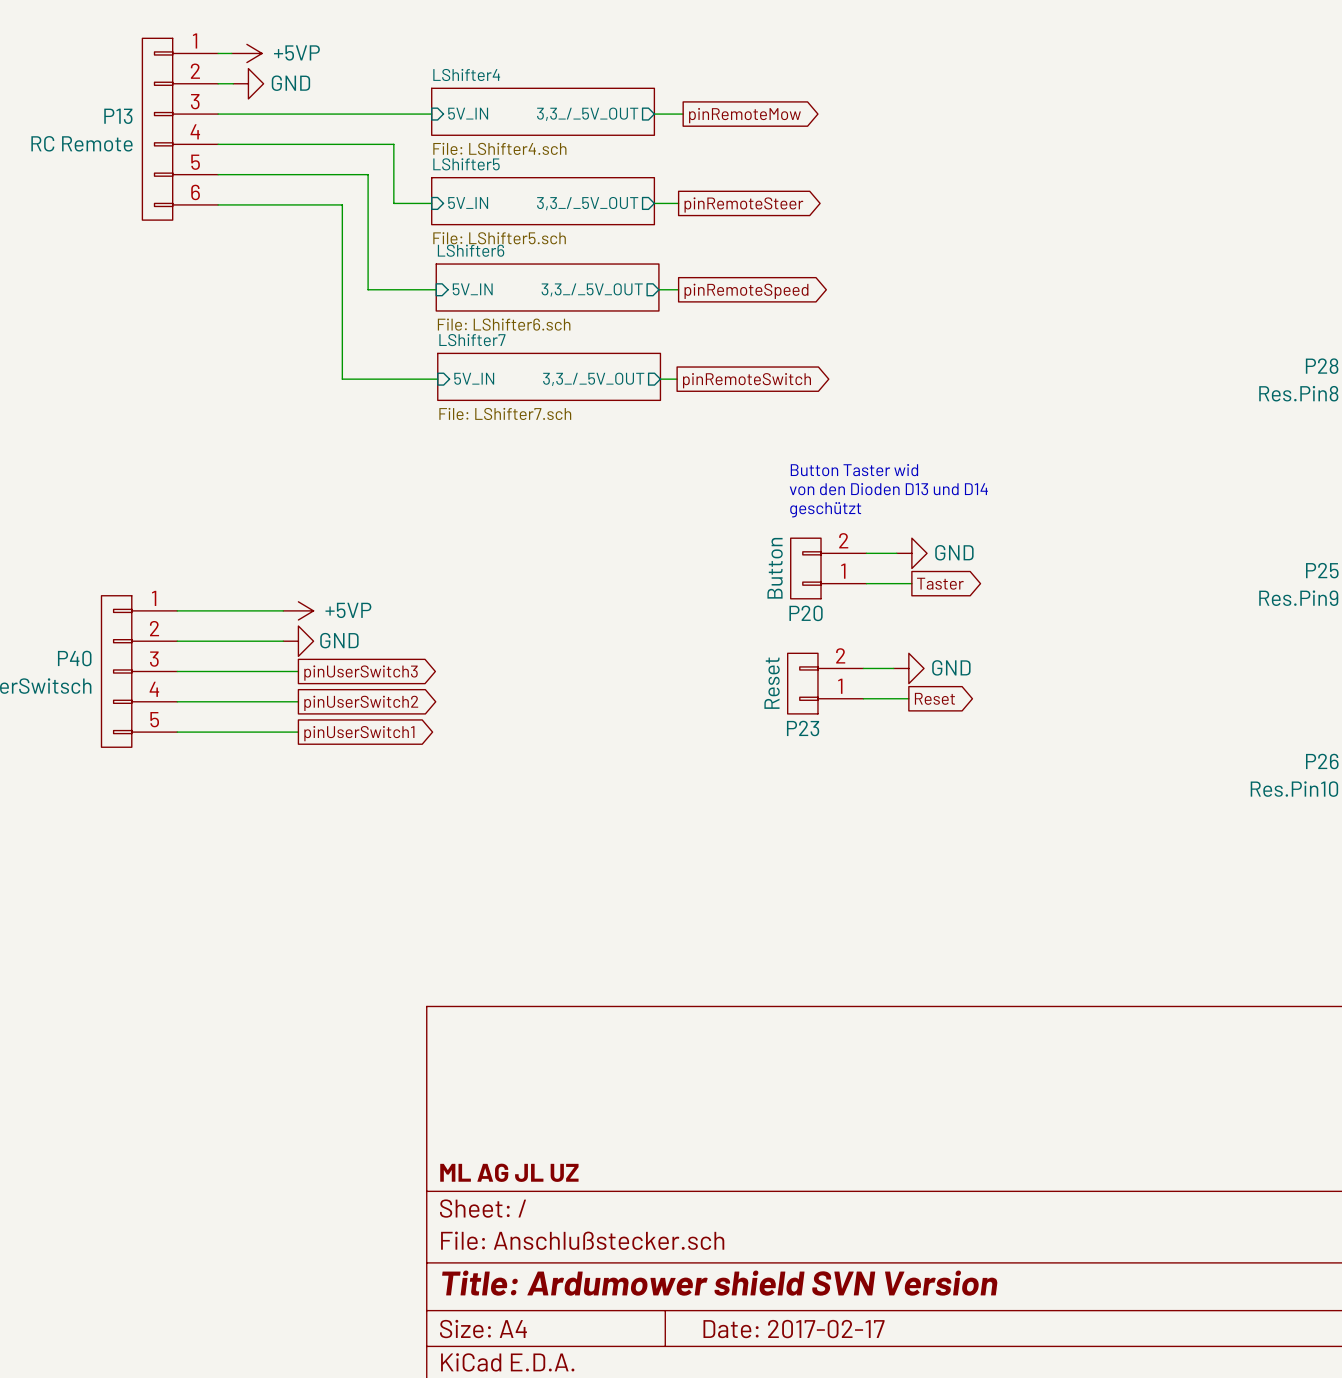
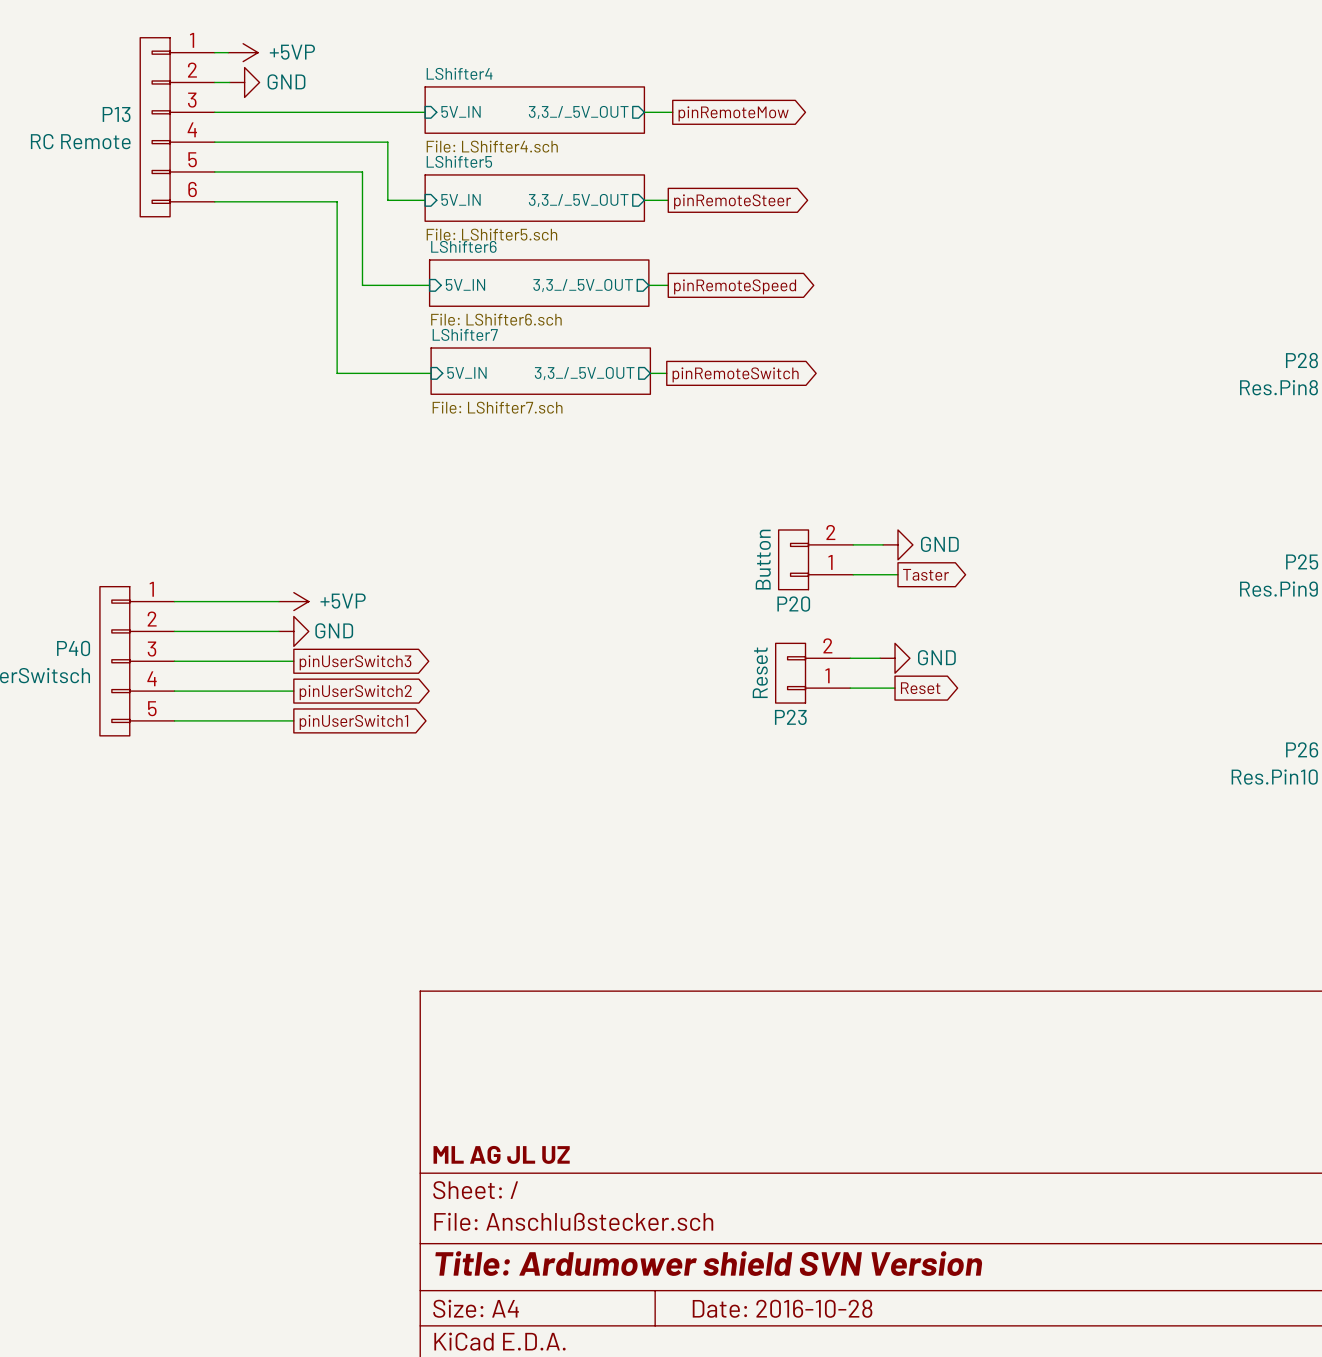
text: Button Taster wid (854, 470) -> none
text: von den Dioden D13 und D14 (888, 489) -> none
text: geschützt (825, 509) -> none
title block: Date: 2017-02-17 (794, 1329) -> Date: 2016-10-28 (782, 1308)

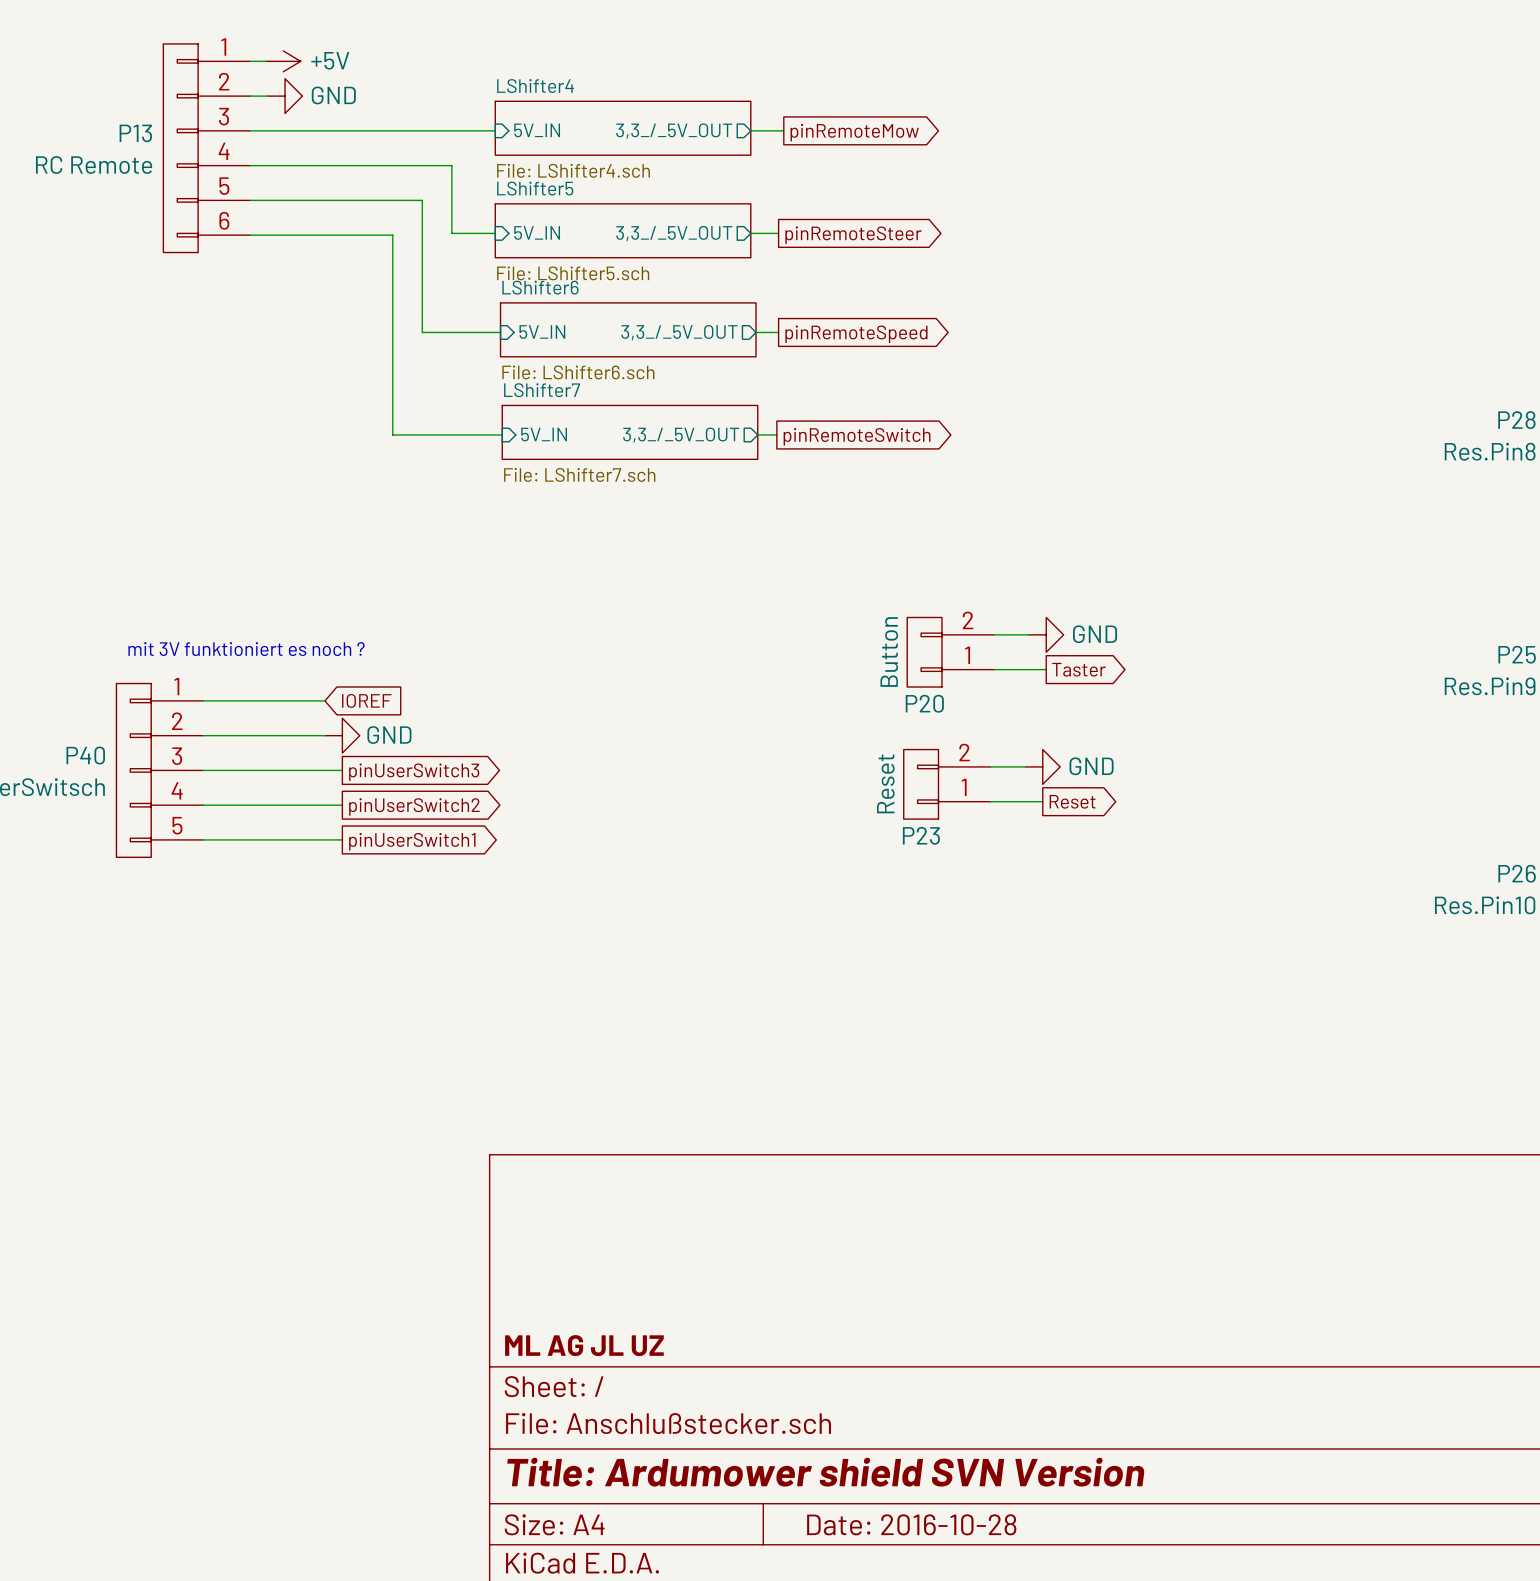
power symbol: +5VP (243, 52) -> +5V (283, 61)
text: none -> mit 3V funktioniert es noch ? (246, 649)
power symbol: +5VP (293, 601) -> none
global label: none -> IOREF (366, 700)

